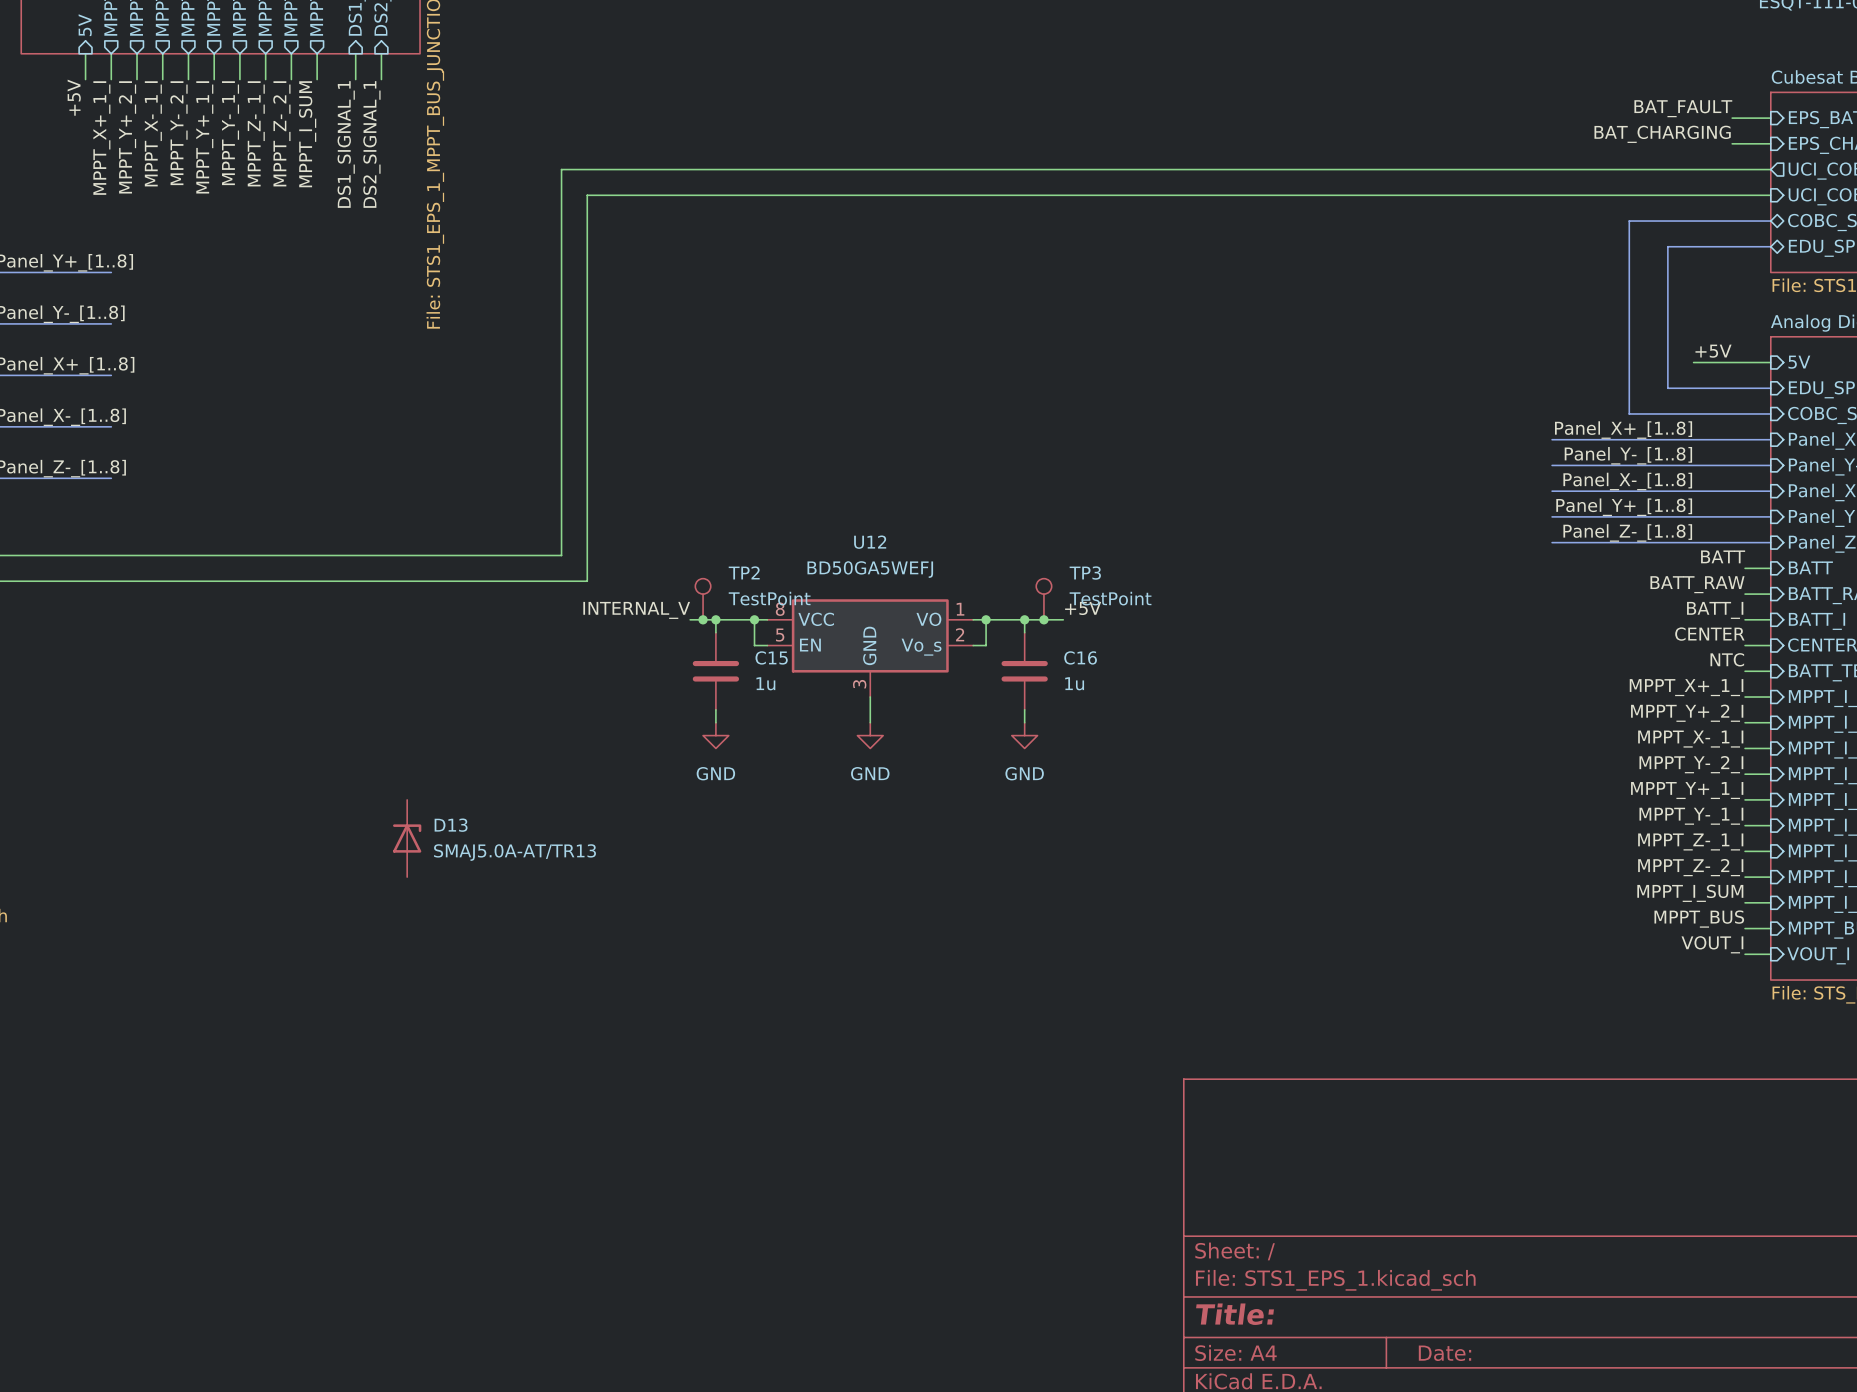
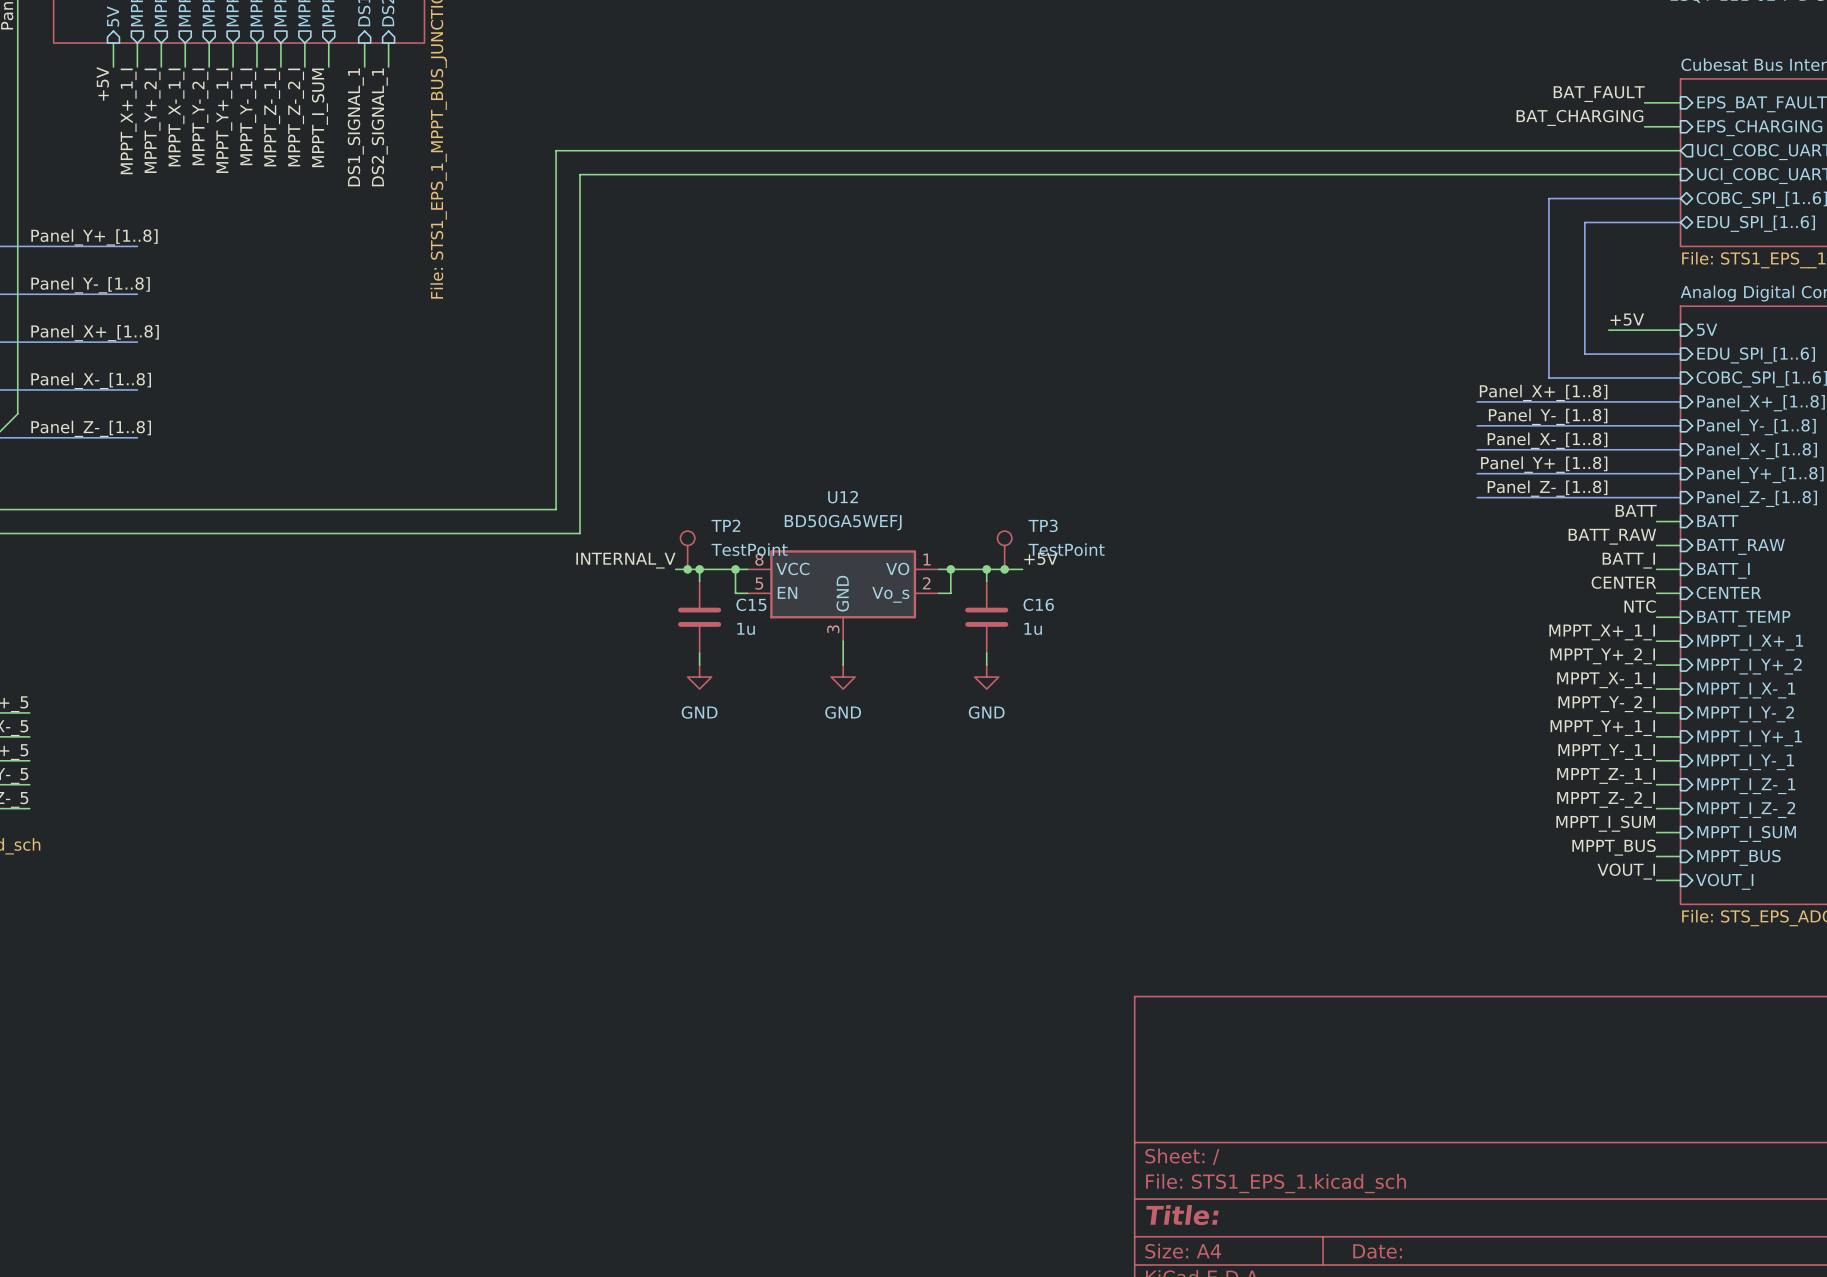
D13: SMAJ5.0A-AT/TR13 (407, 838) -> none

